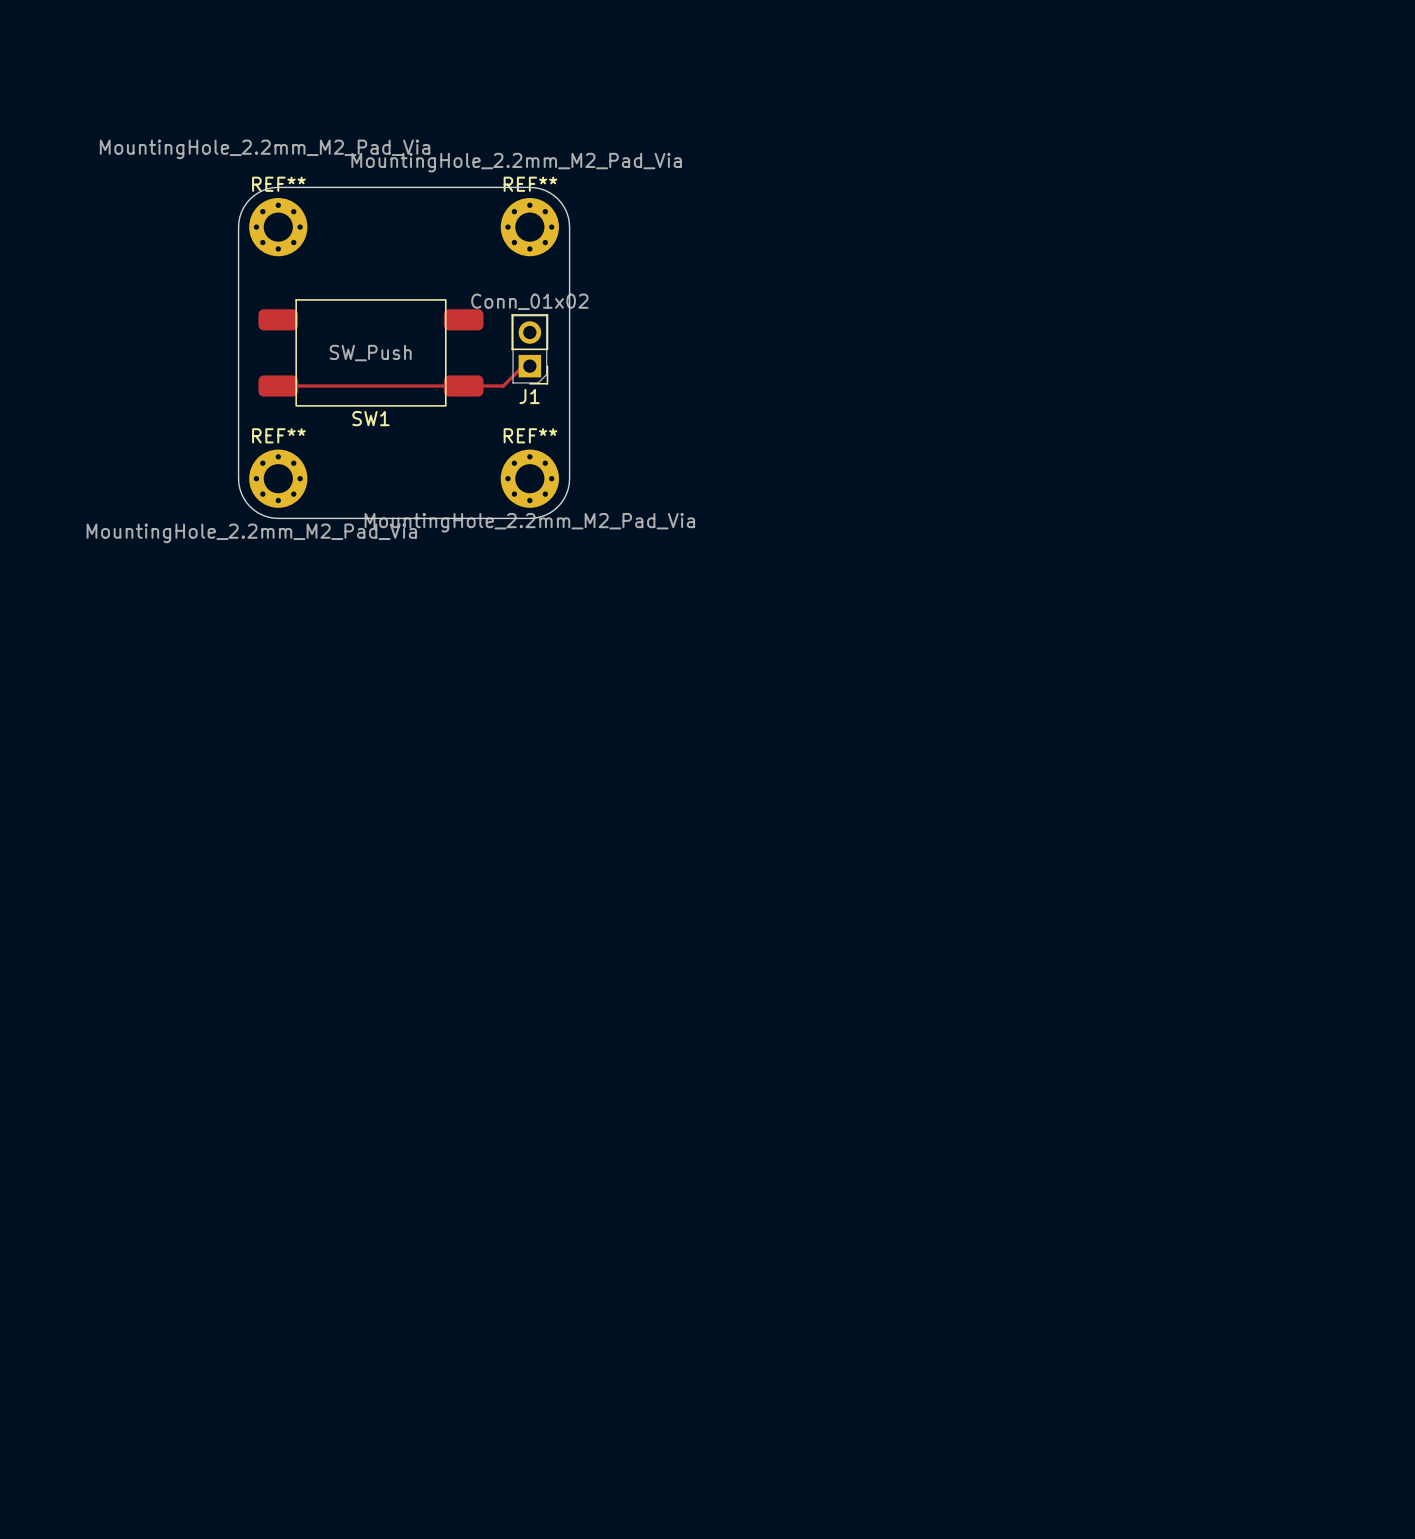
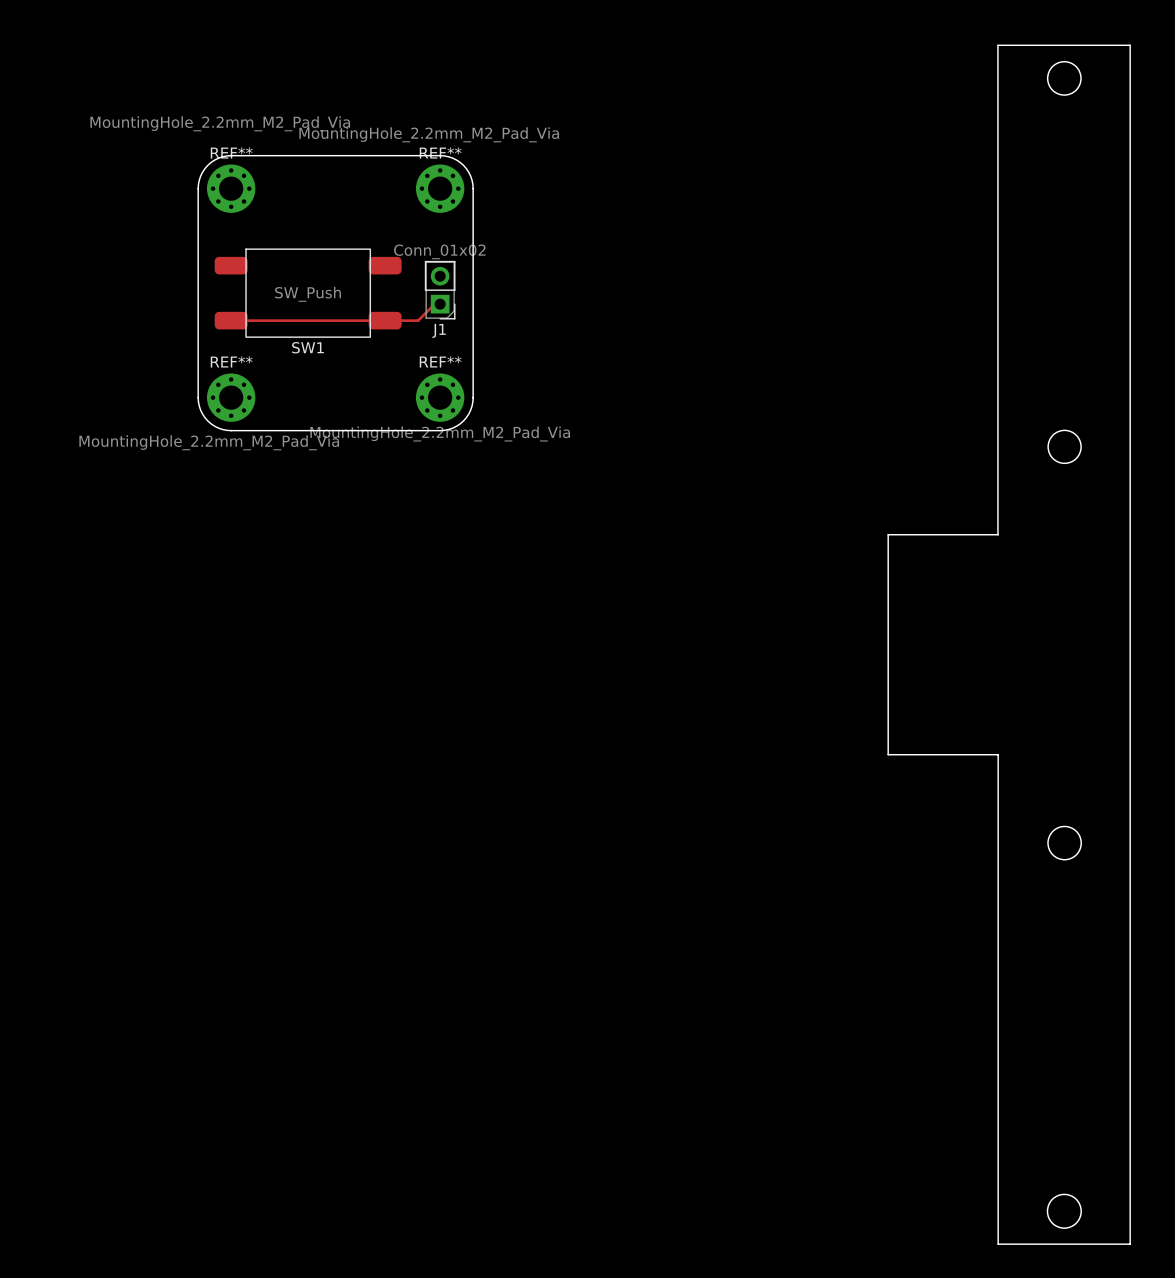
board edge: none -> (997, 45) (997, 534)
board edge: none -> (998, 45) (1130, 45) (1130, 1244) (998, 1244) (998, 754) (888, 754) (888, 534) (998, 534)
round board edge: none -> [1047, 61, 1082, 96]
round board edge: none -> [1047, 429, 1082, 464]
round board edge: none -> [1047, 825, 1082, 861]
round board edge: none -> [1046, 1193, 1082, 1229]

